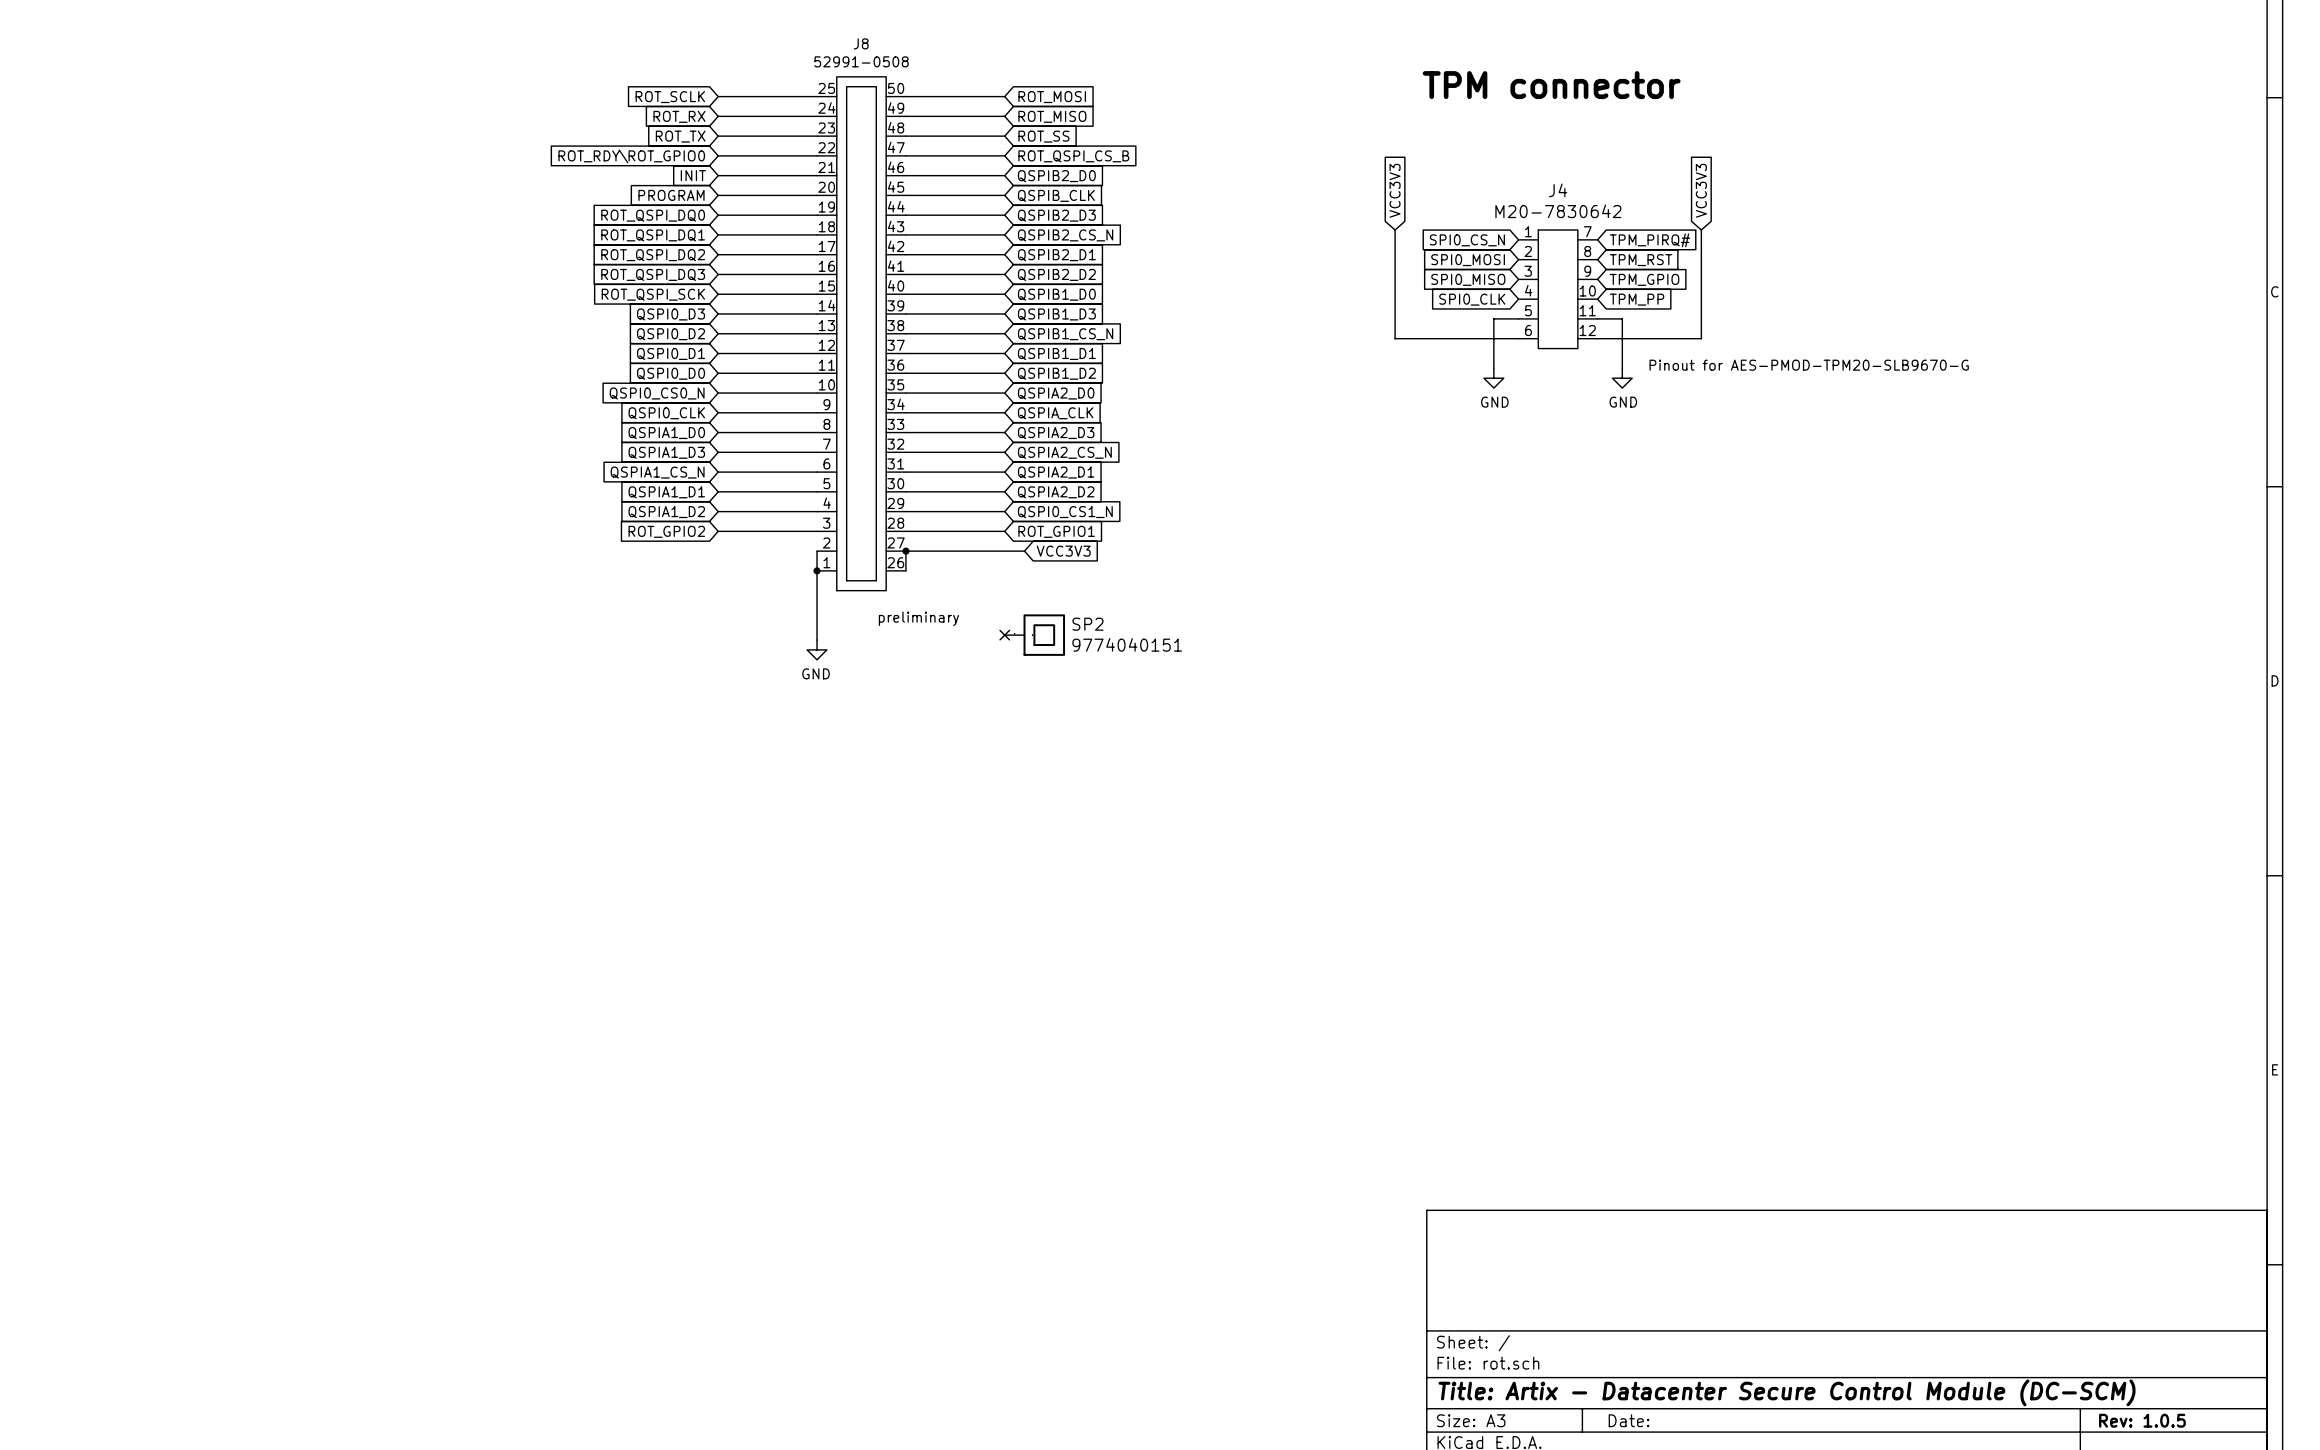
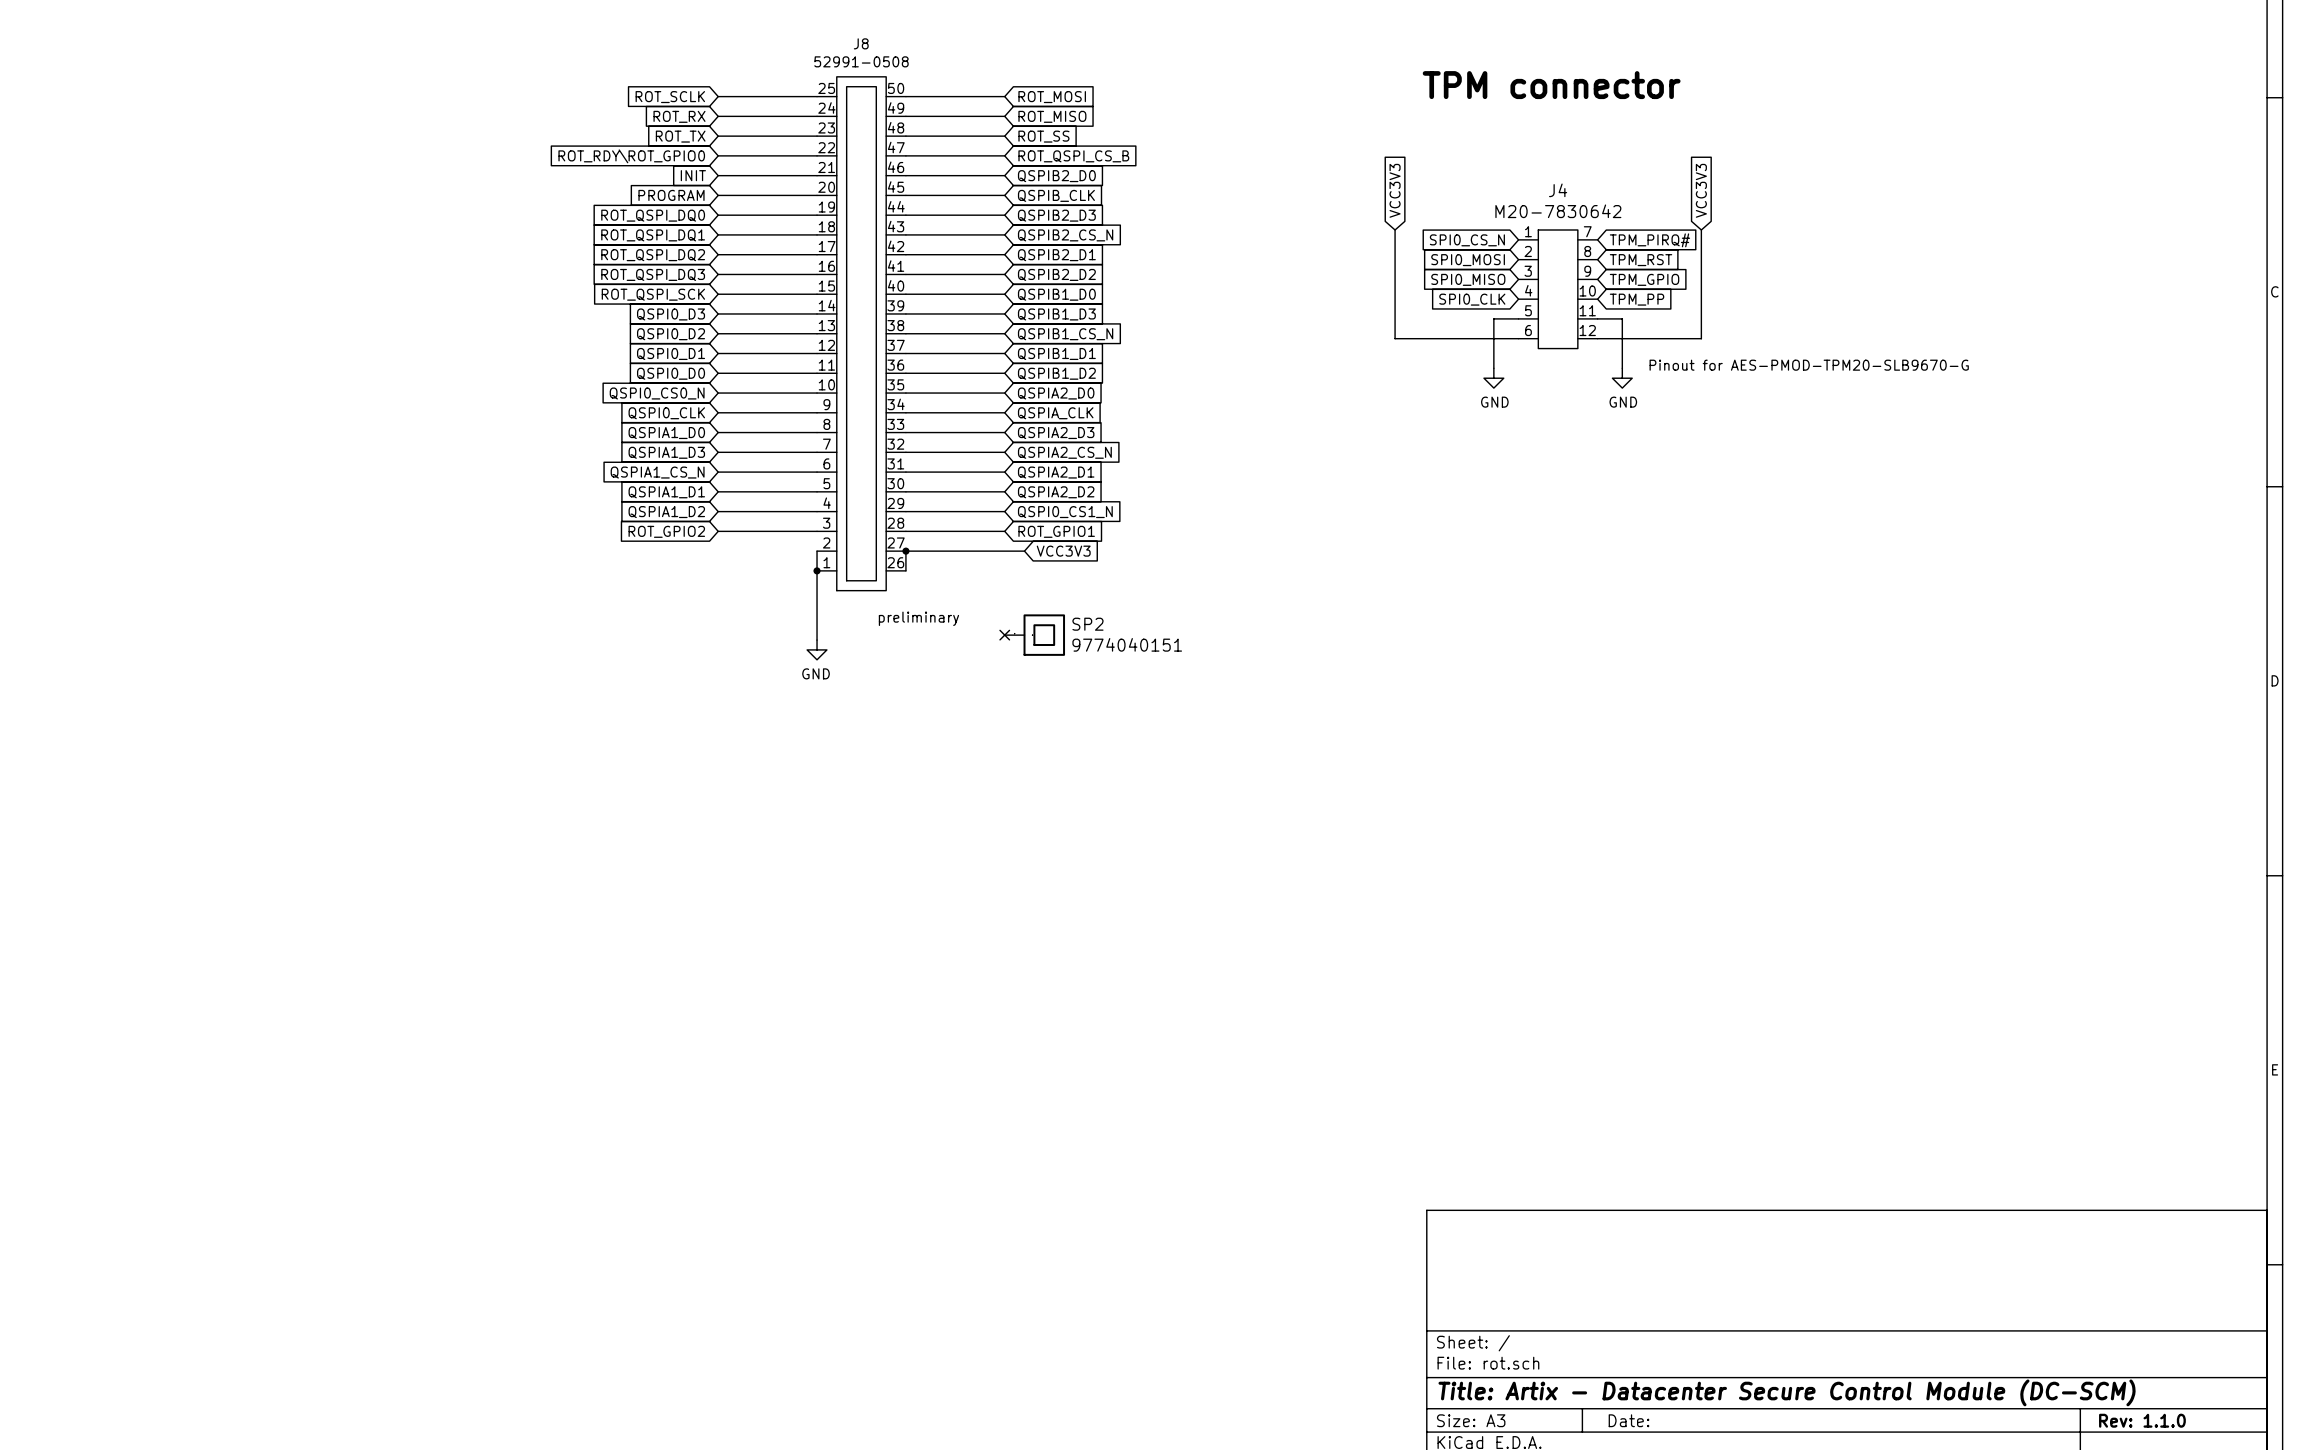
title block: Rev: 1.0.5 (2142, 1420) -> Rev: 1.1.0 (2142, 1420)

